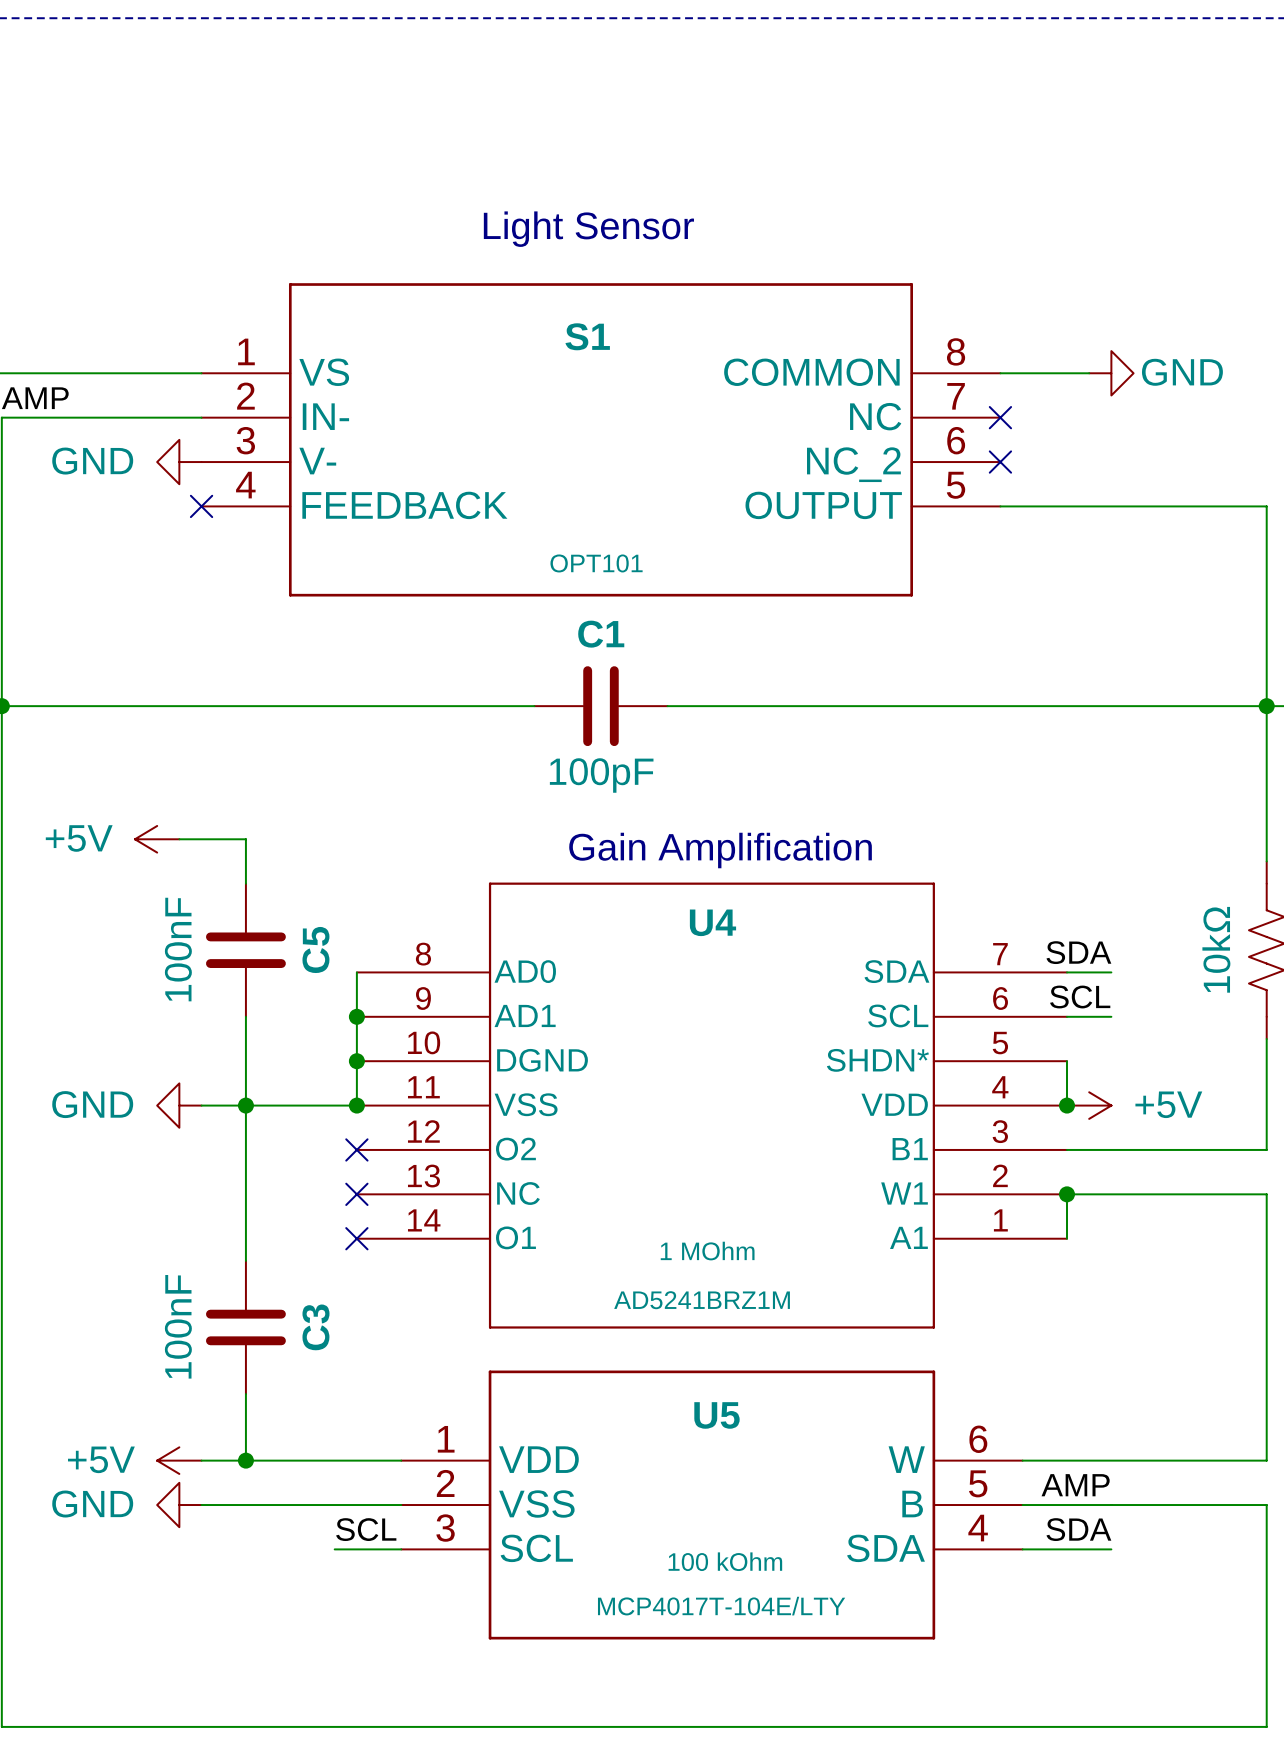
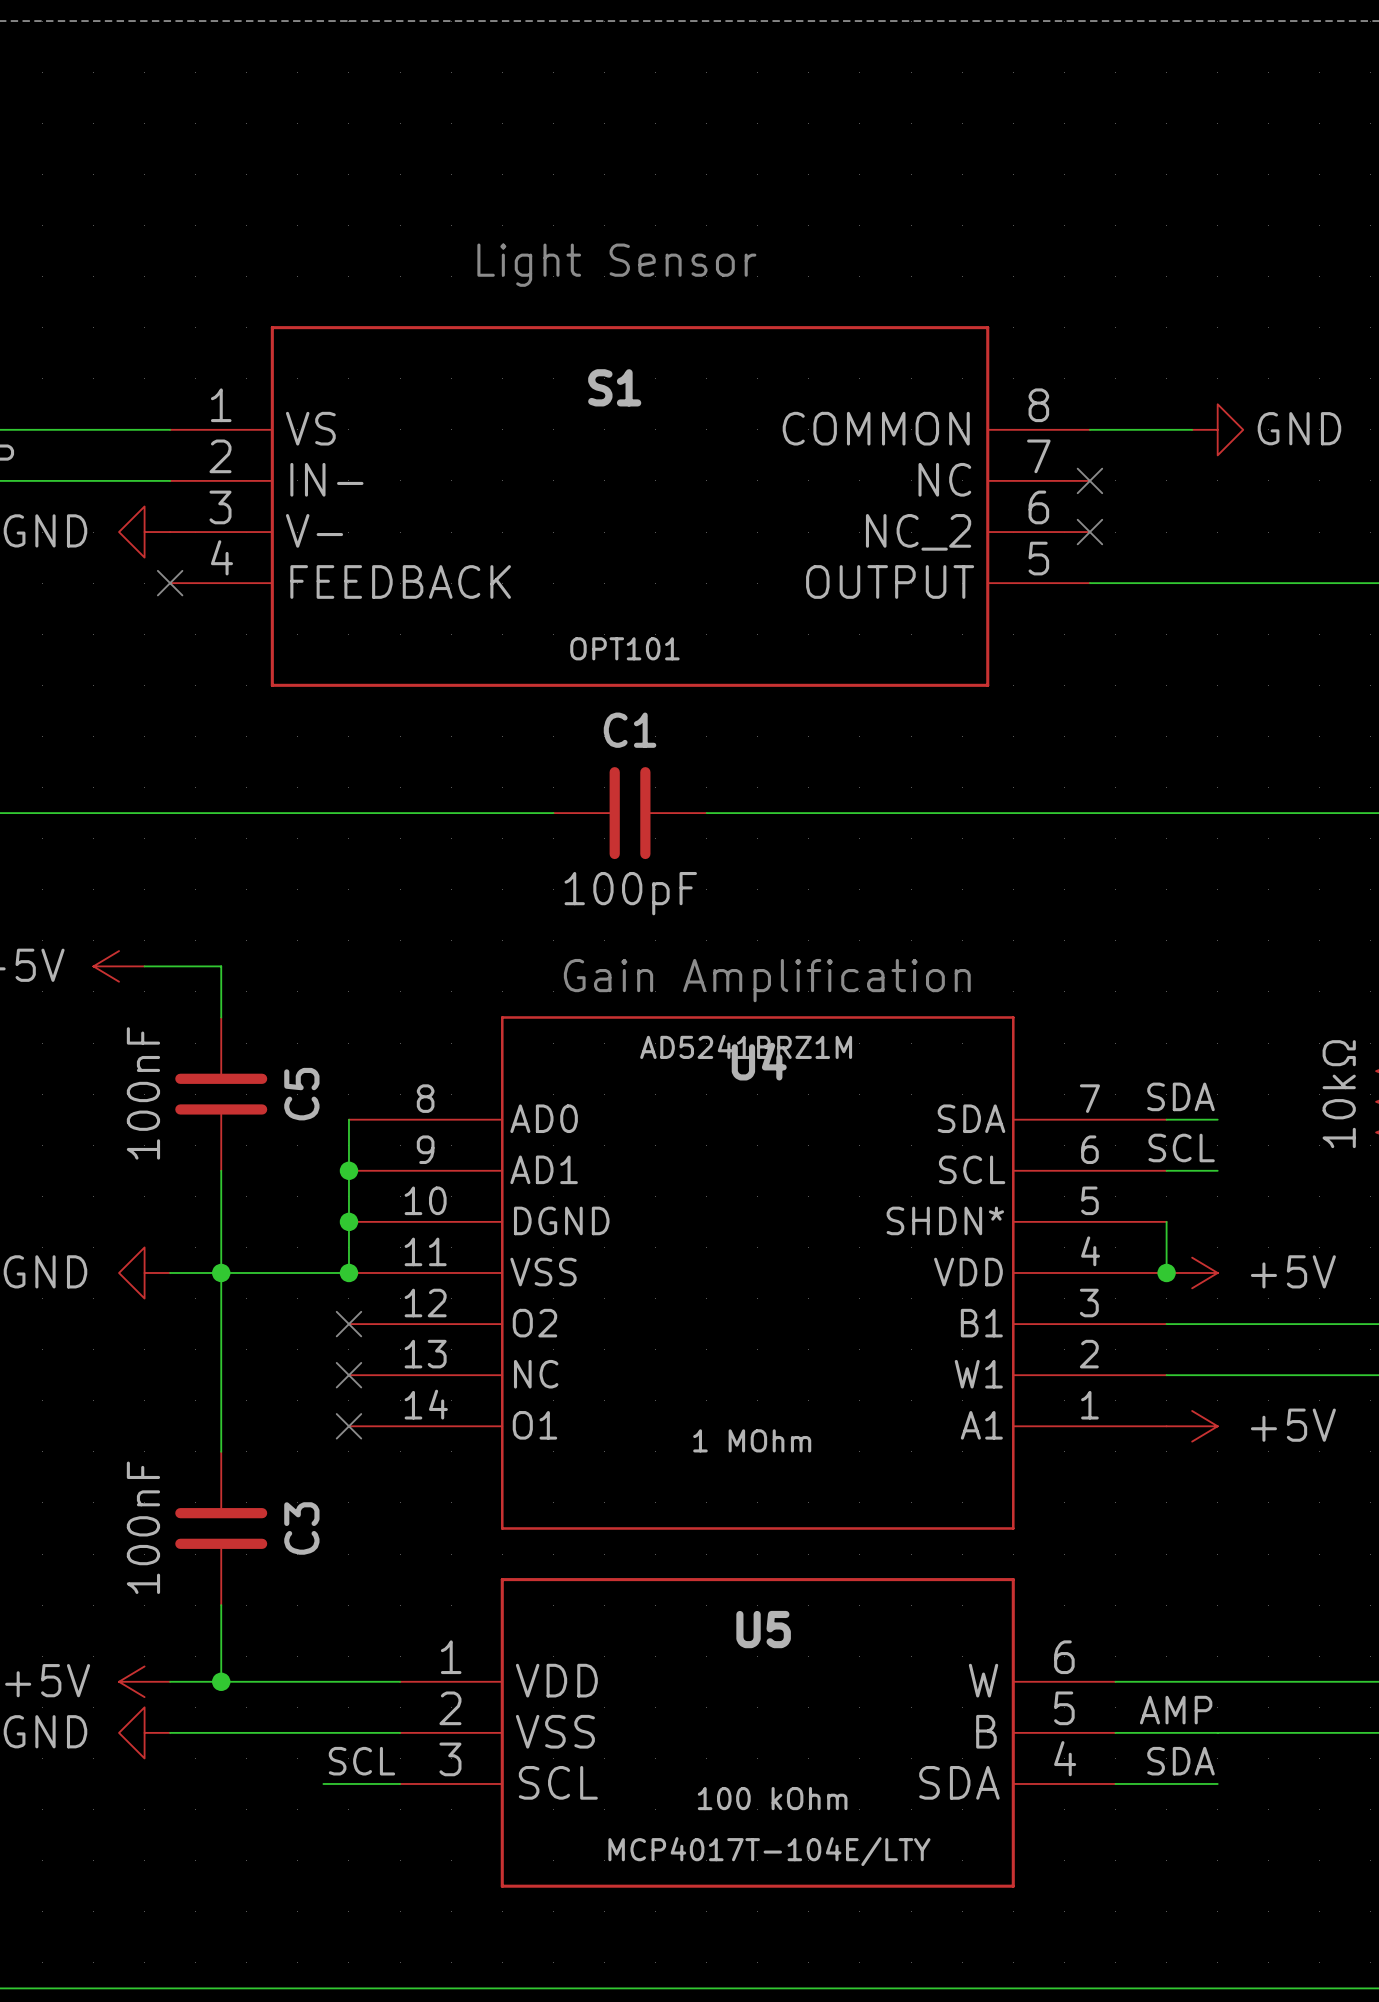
wire: (1066, 1194) (1066, 1238) -> none
junction: (1066, 1194) -> none
power symbol: none -> +5V (1192, 1426)
U4 text position: AD5241BRZ1M (702, 1300) -> AD5241BRZ1M (746, 1046)

